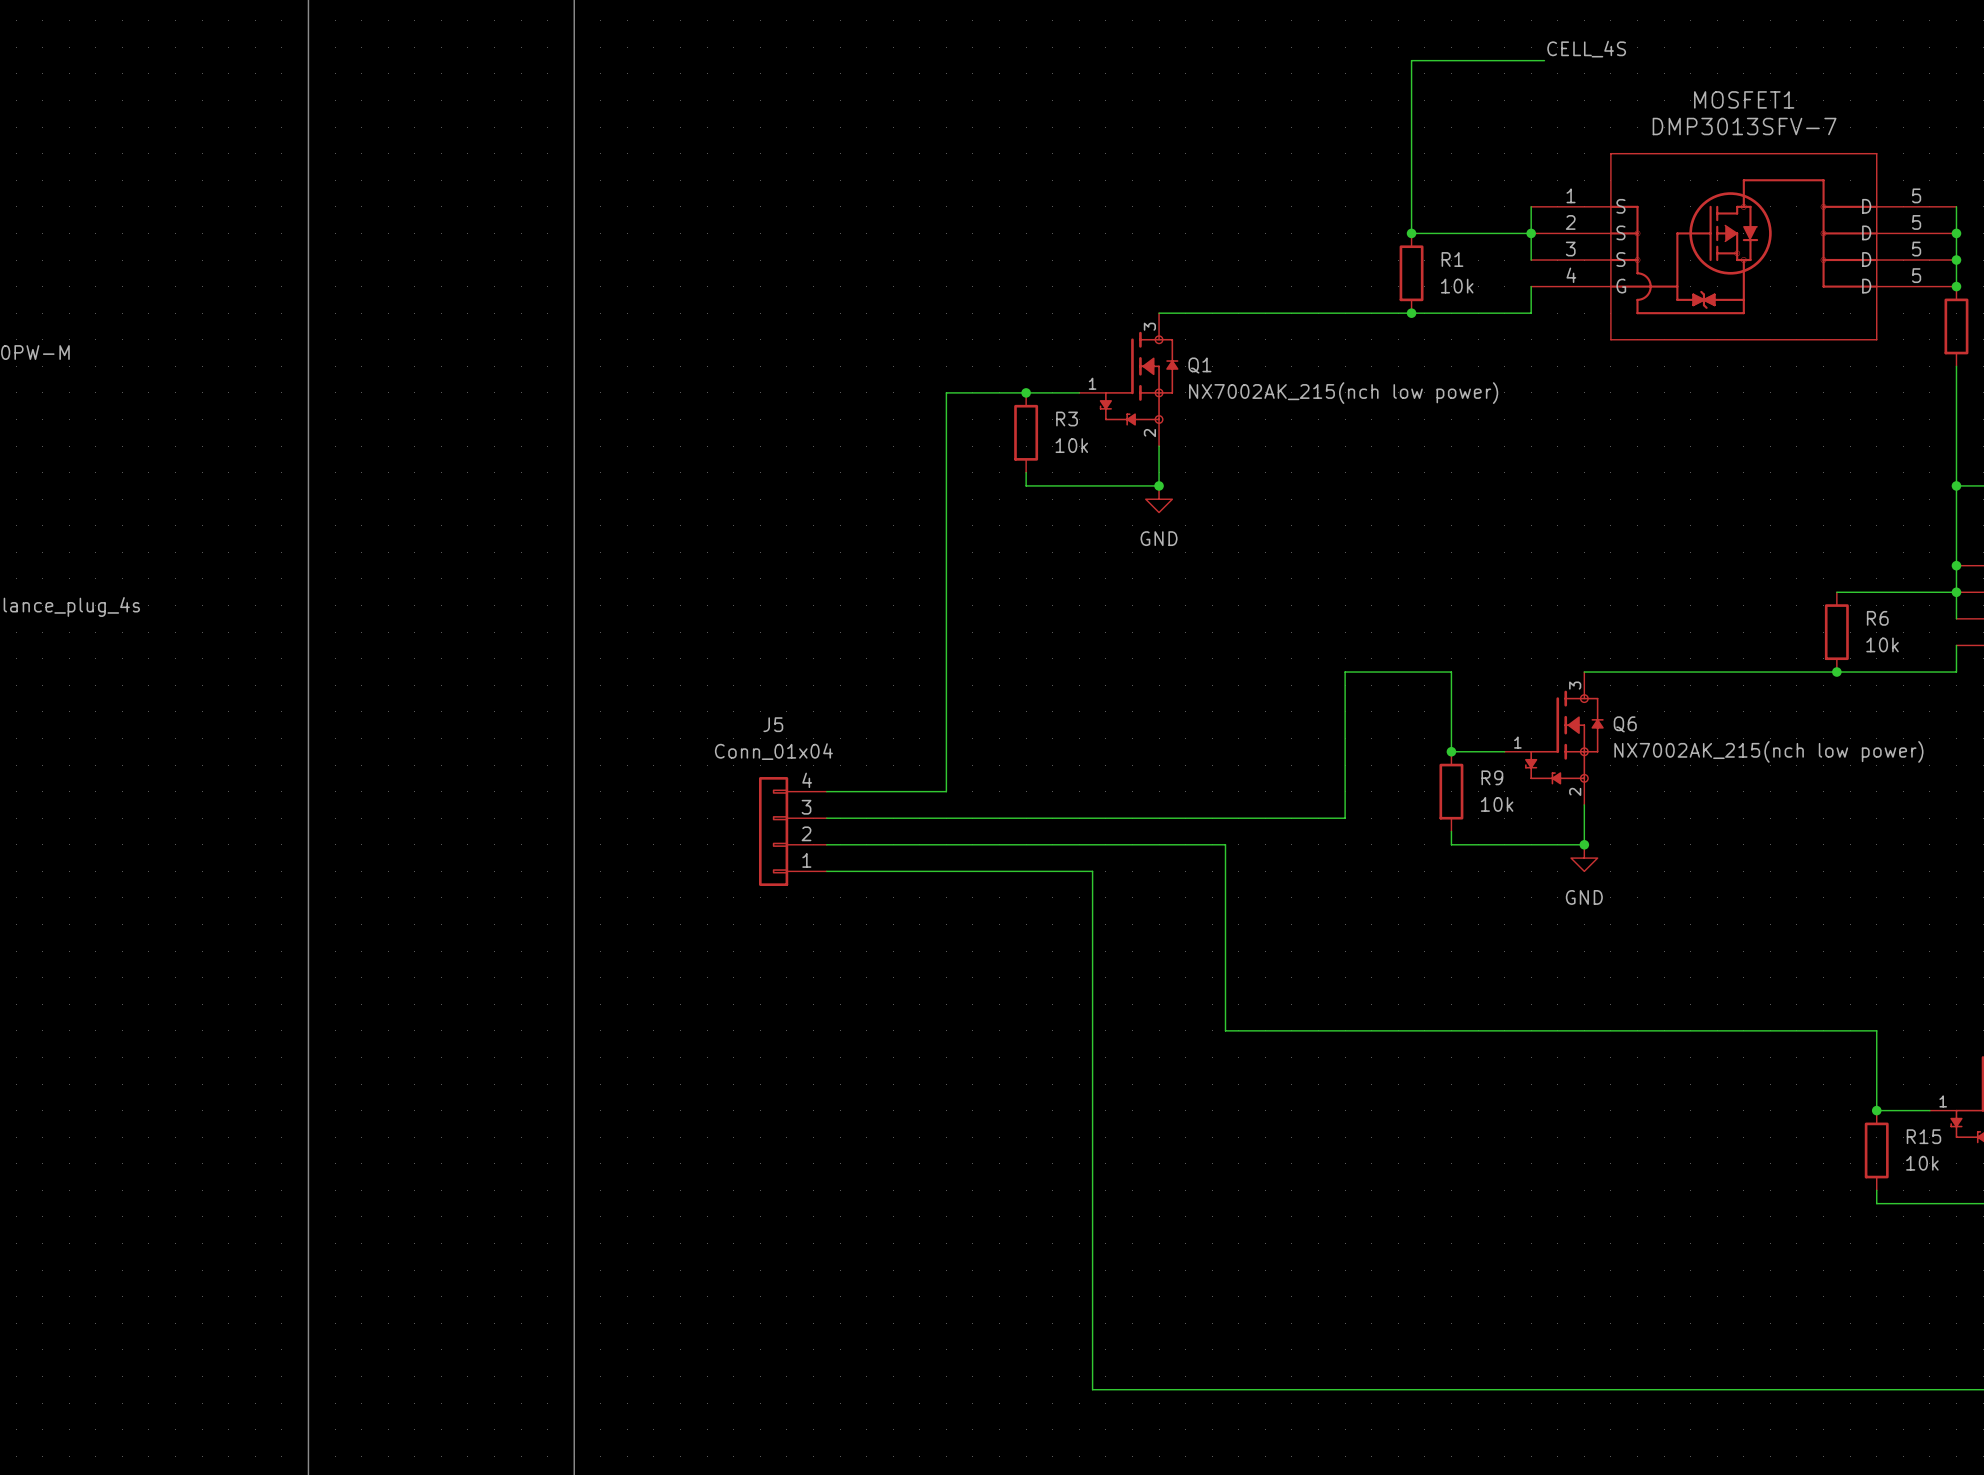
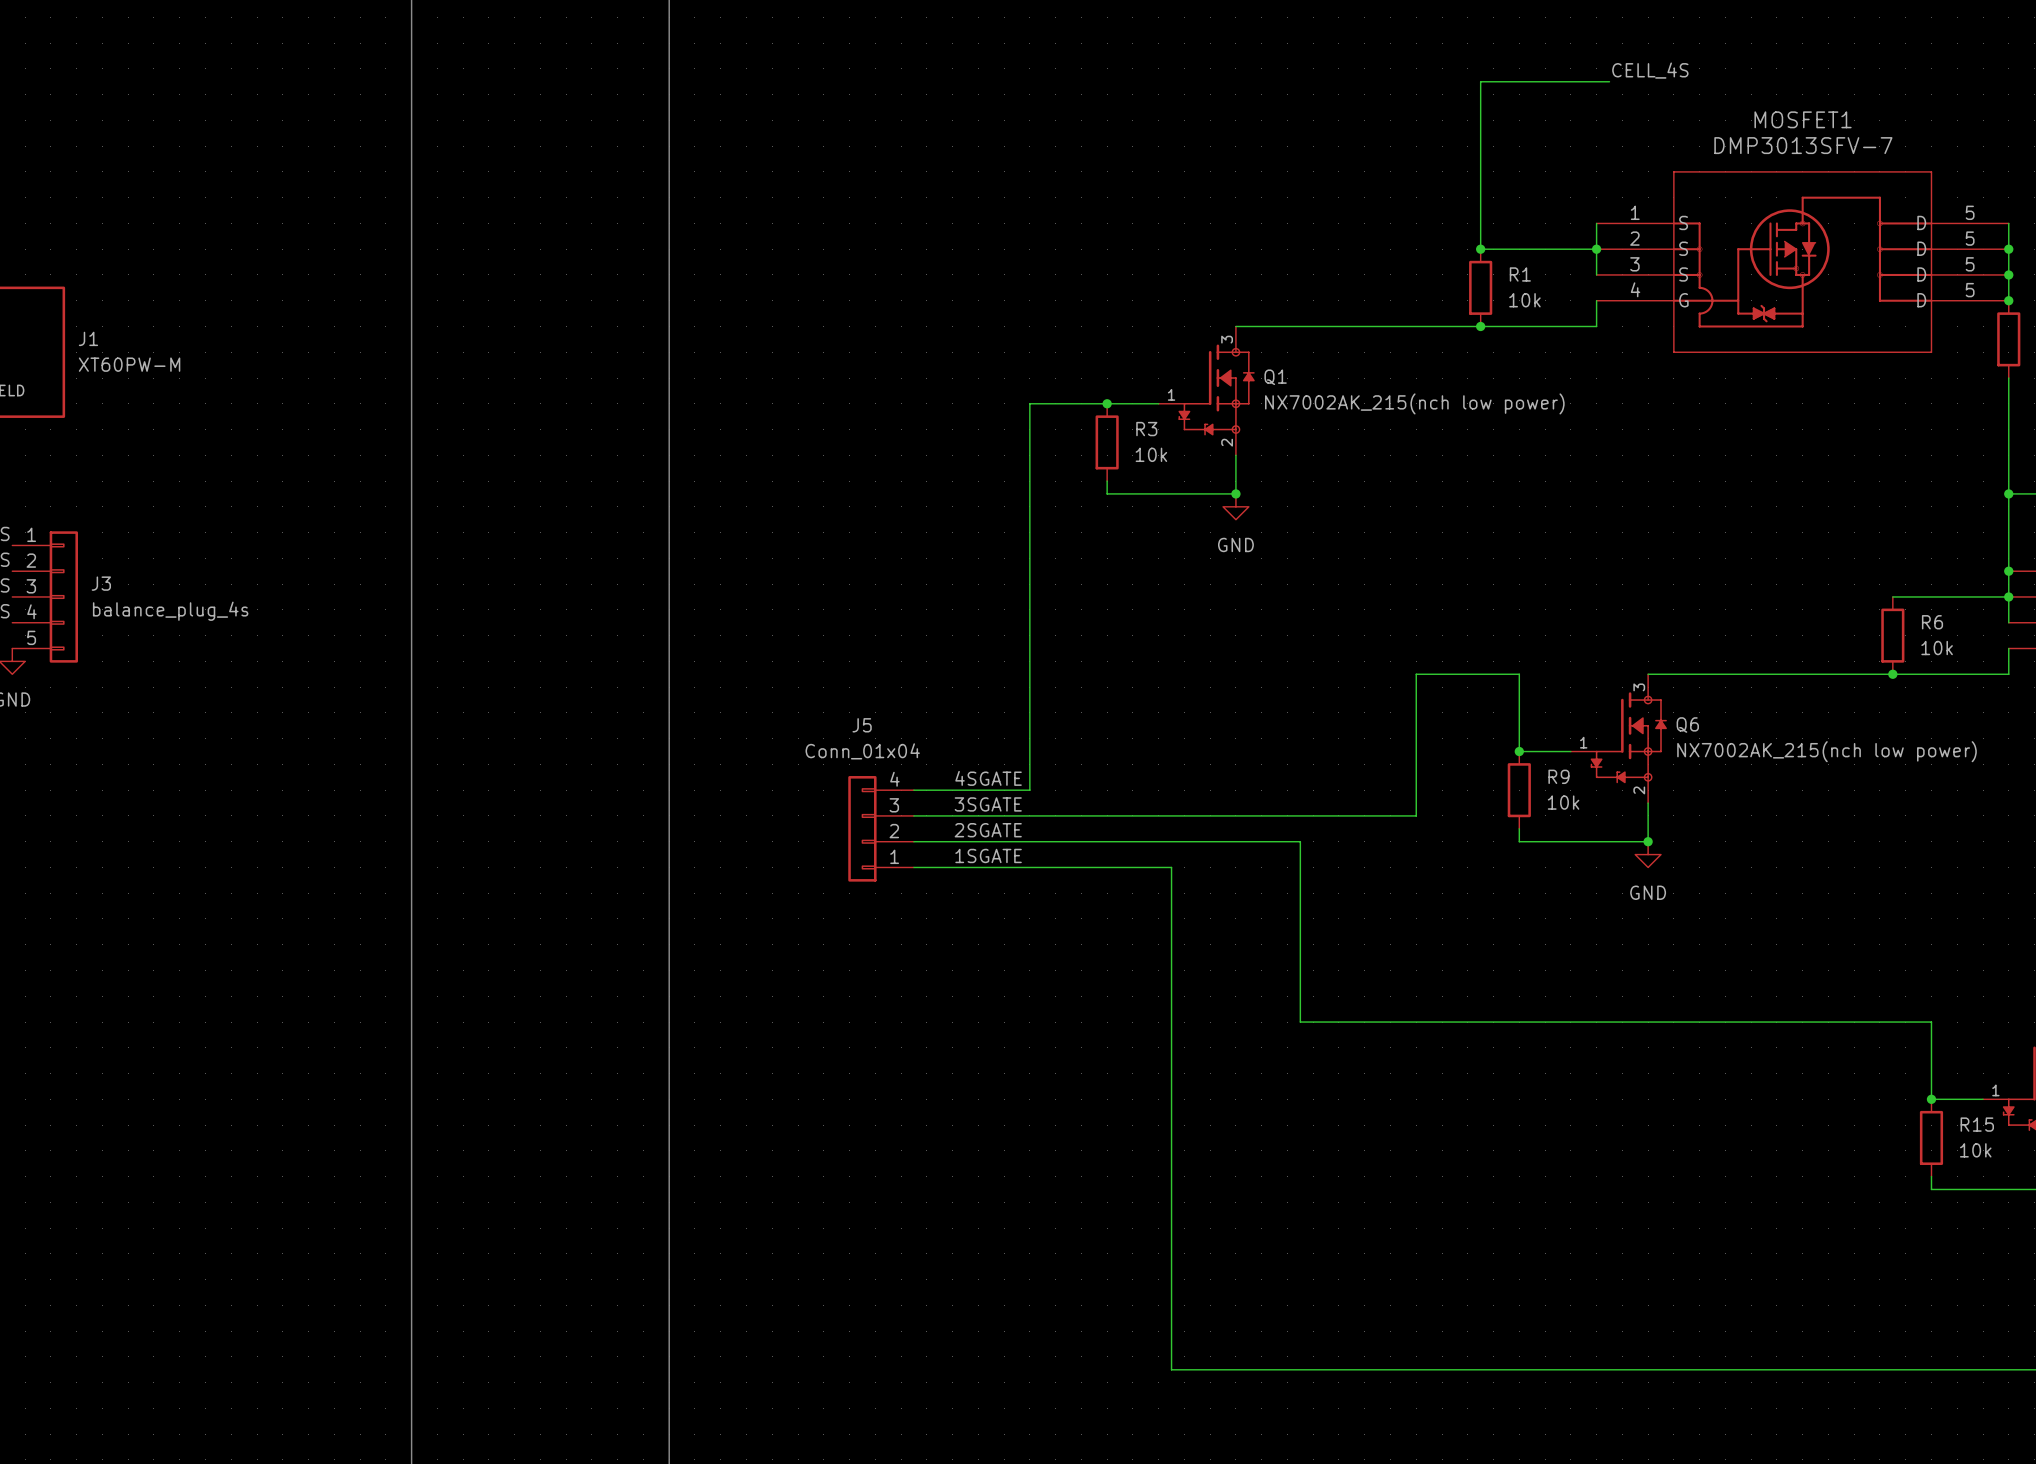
label: none -> 4SGATE (988, 778)
label: none -> 3SGATE (988, 804)
label: none -> 2SGATE (988, 830)
label: none -> 1SGATE (988, 855)

